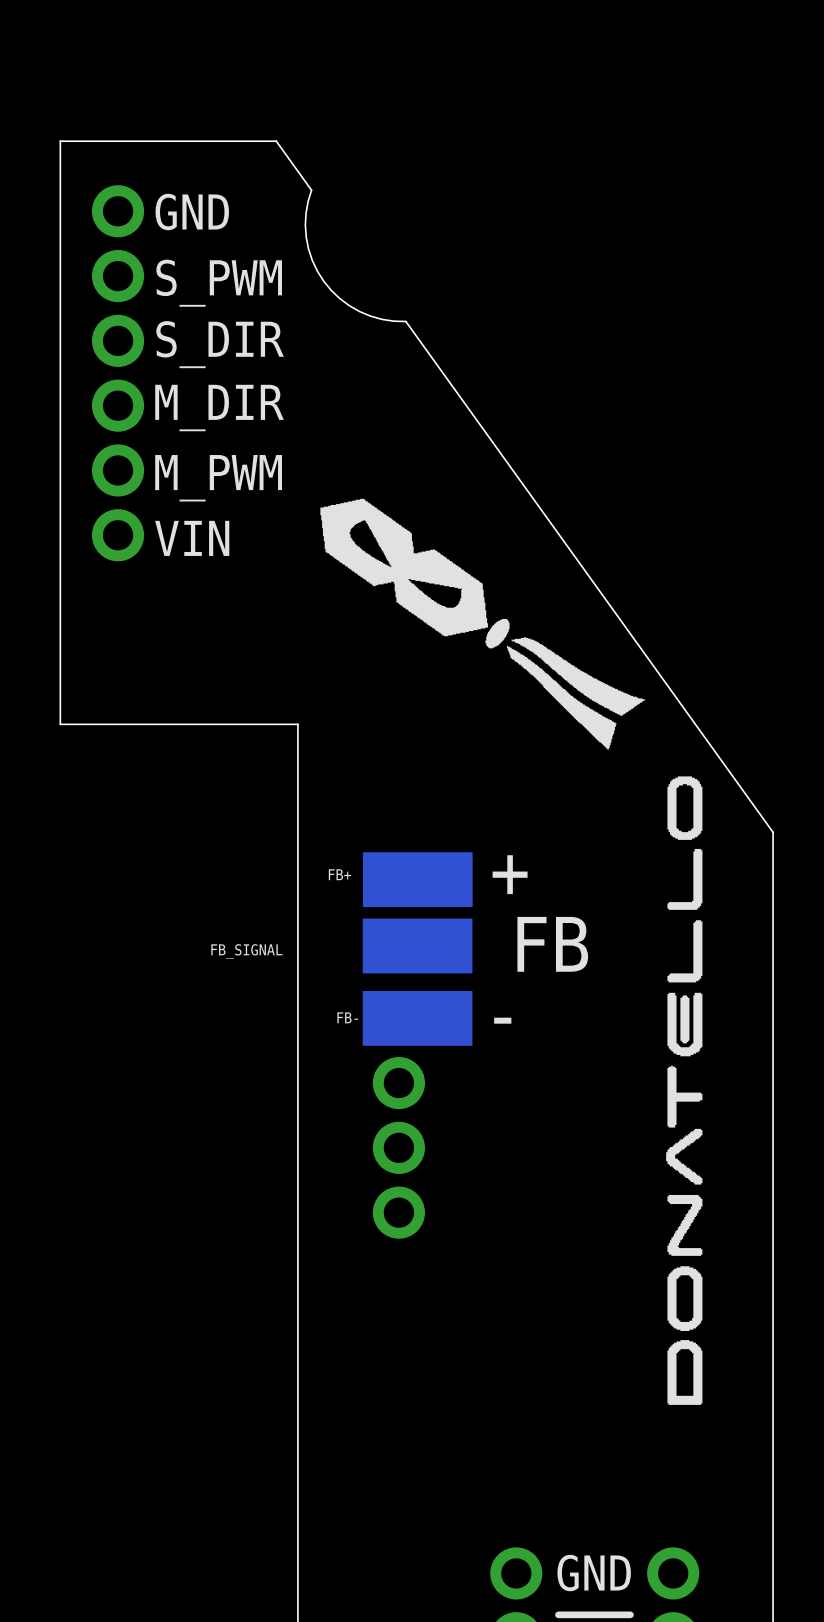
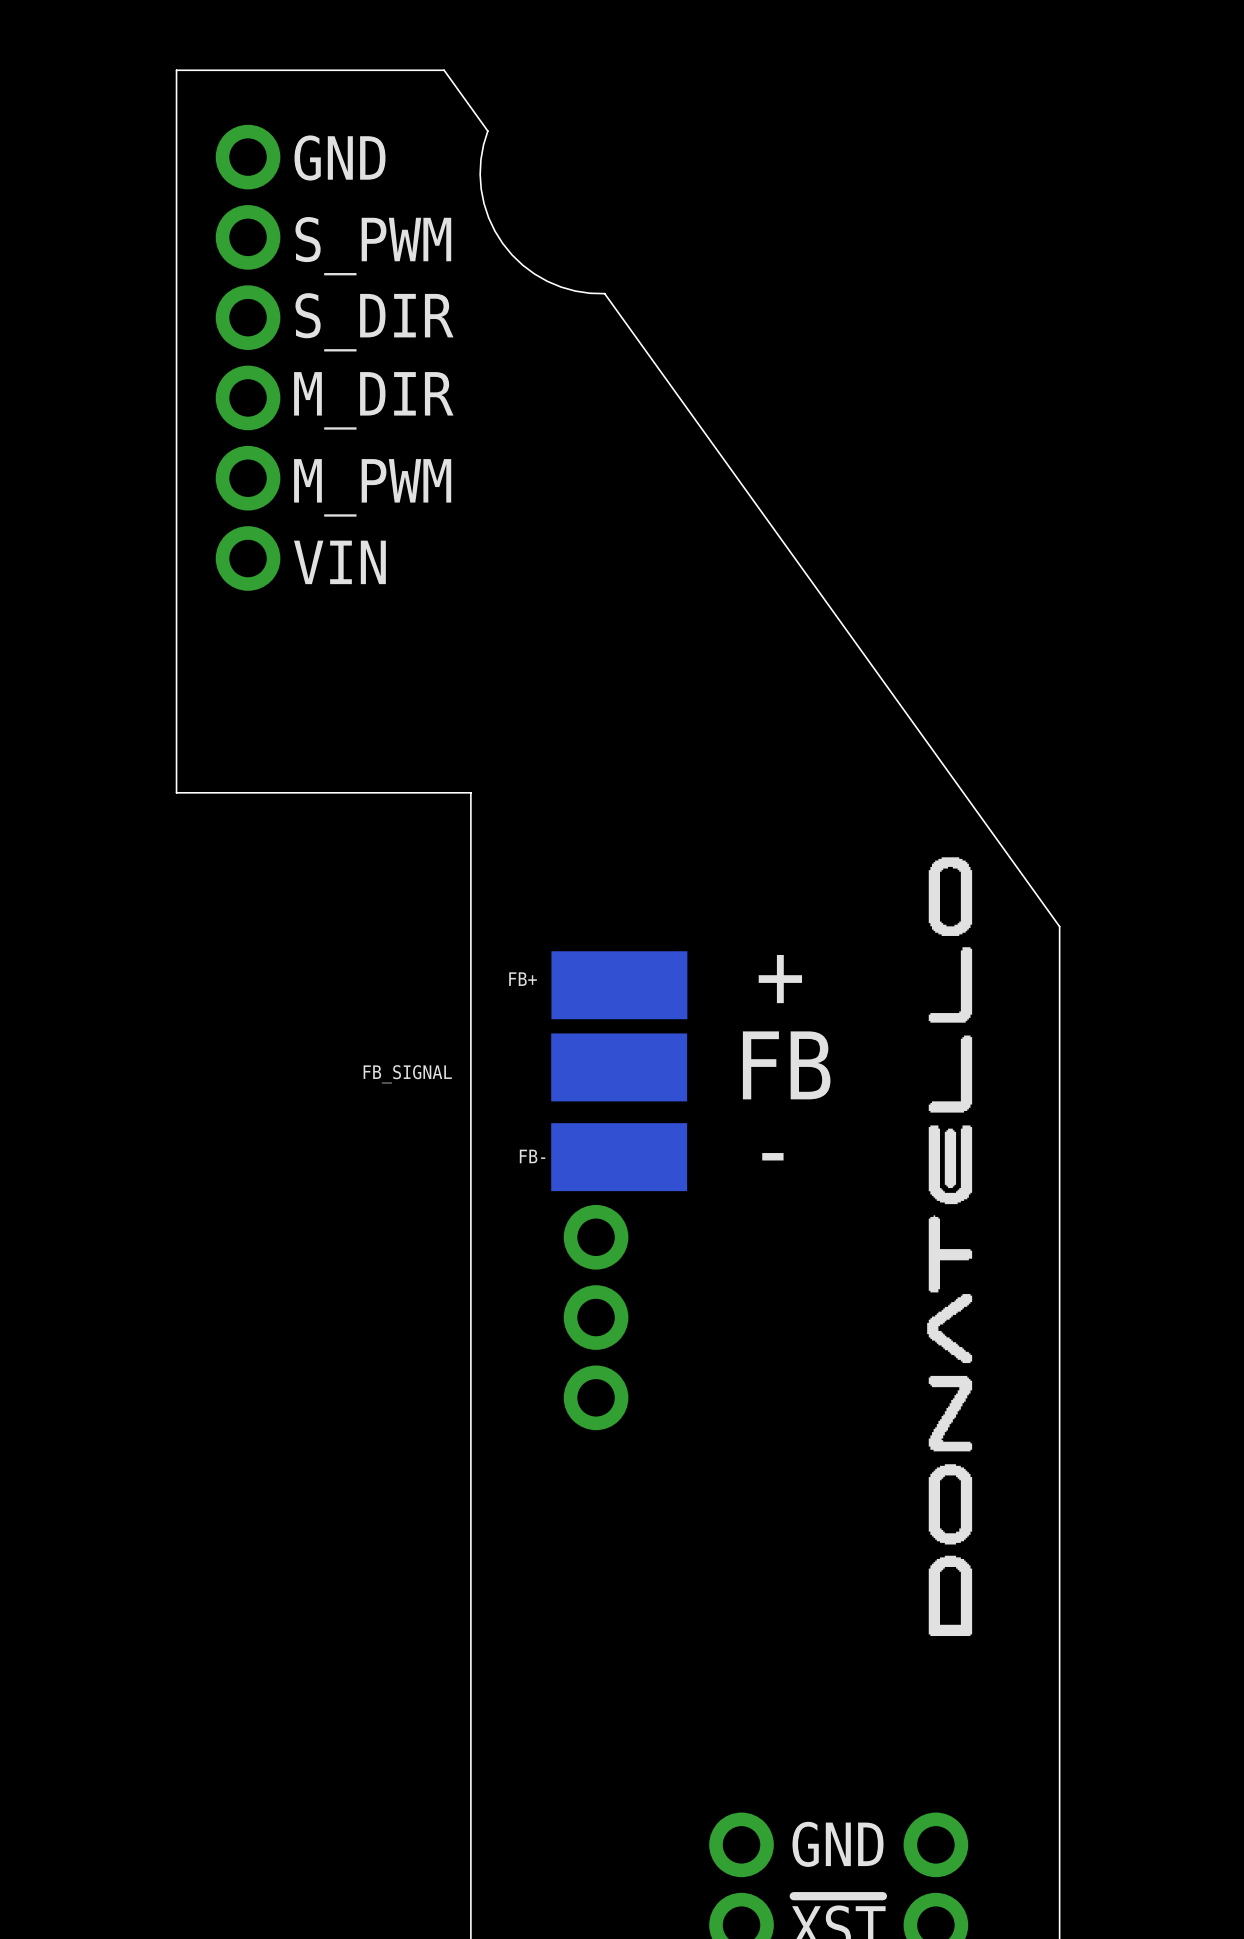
drawing: [320, 498, 646, 750] -> none
text position: + (510, 874) -> + (780, 979)
text position: - (502, 1020) -> - (772, 1156)

